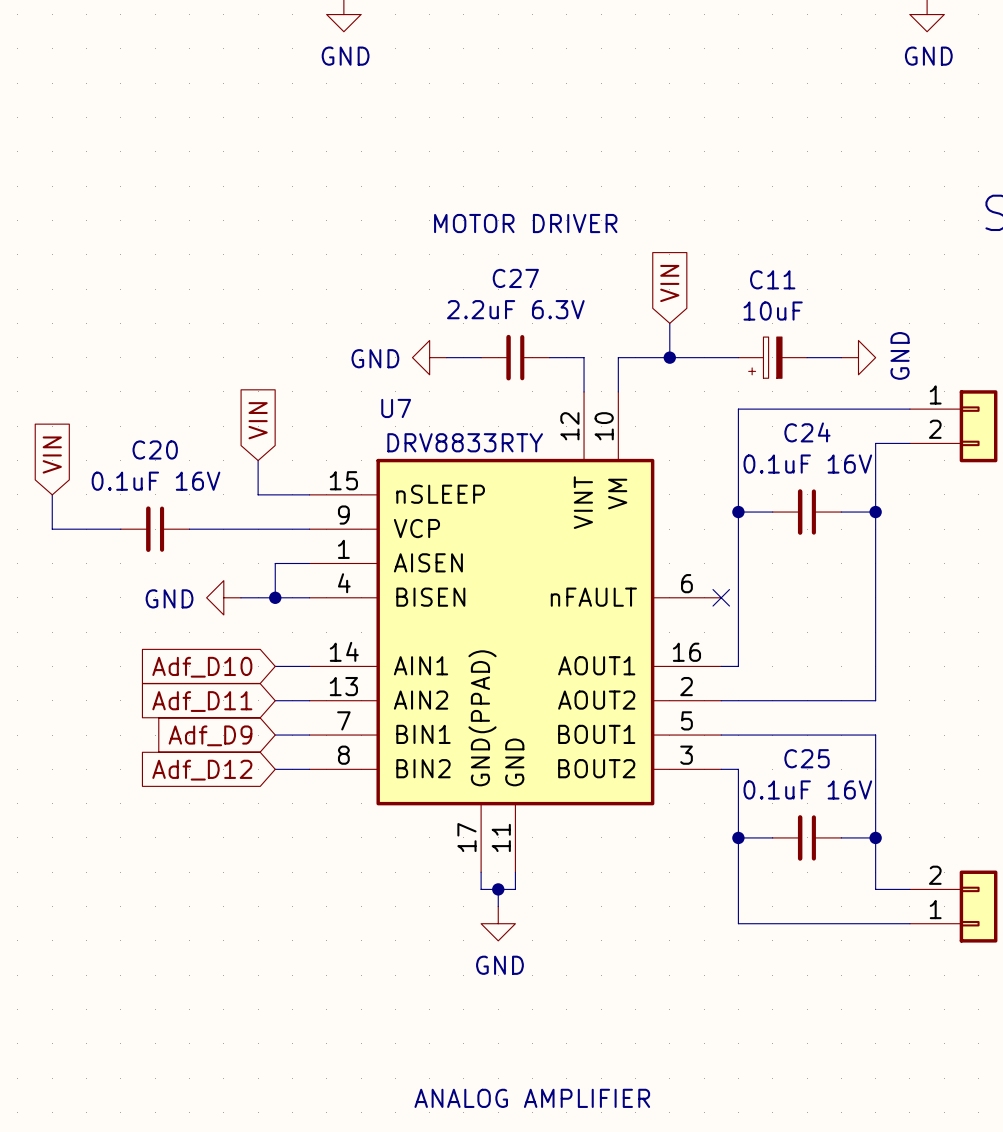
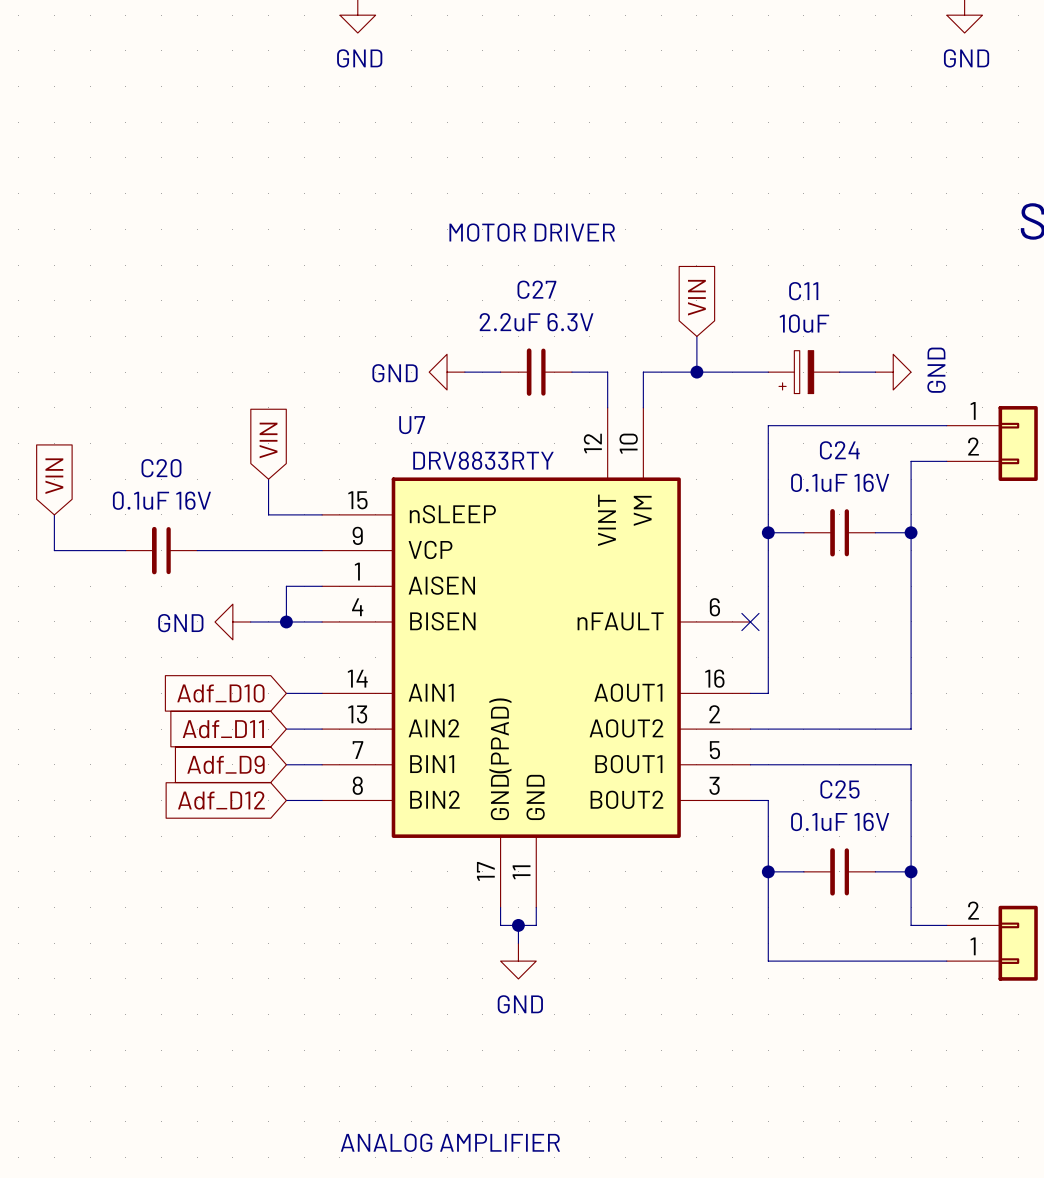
text position: ANALOG AMPLIFIER (532, 1098) -> ANALOG AMPLIFIER (450, 1142)

